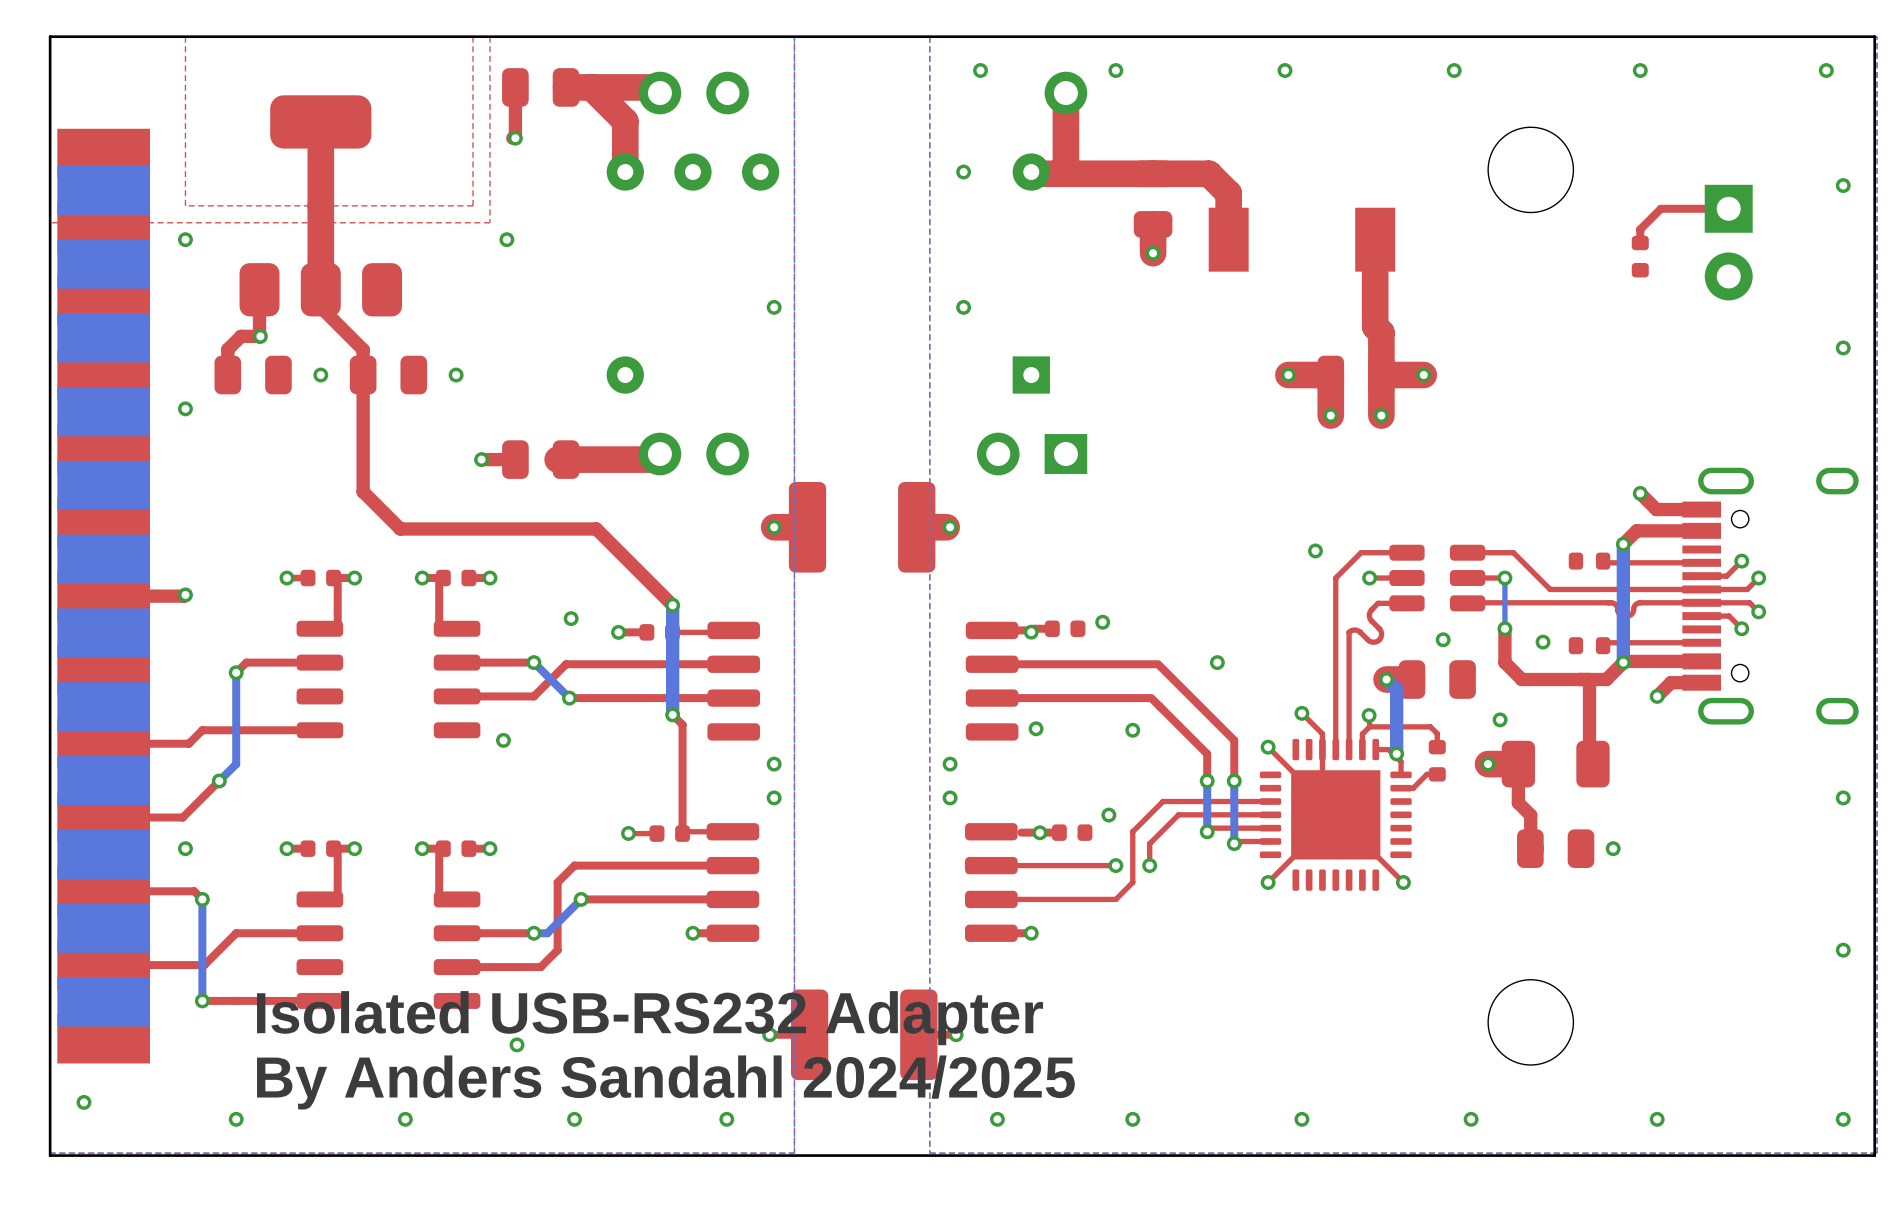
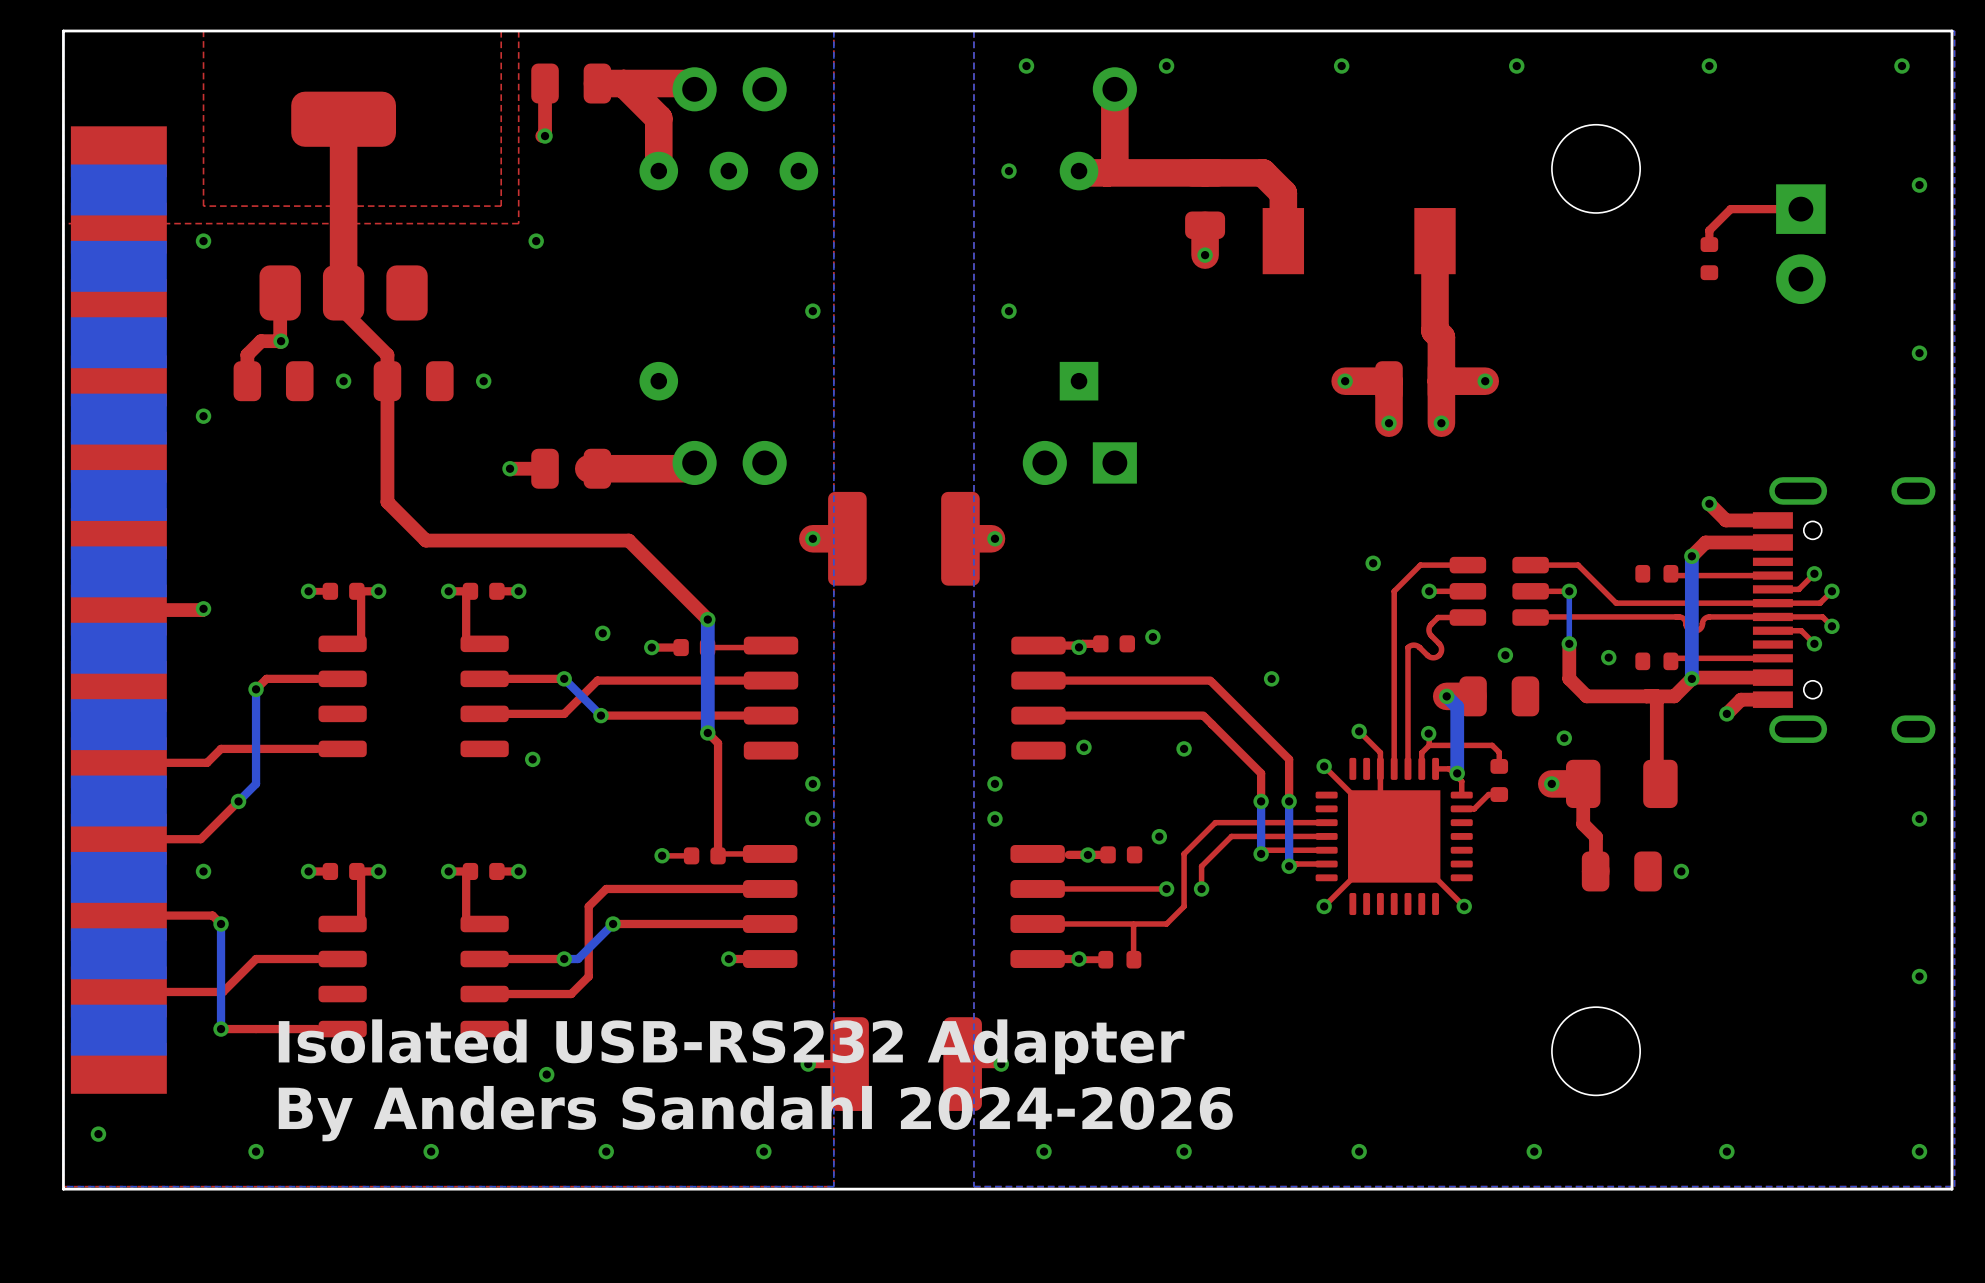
top track: none -> (1133, 924) (1133, 959)
top track: none -> (1079, 959) (1100, 959)
part: none -> (1119, 959)
text: By Anders Sandahl 2024/2025 (665, 1082) -> By Anders Sandahl 2024-2026 (755, 1113)

